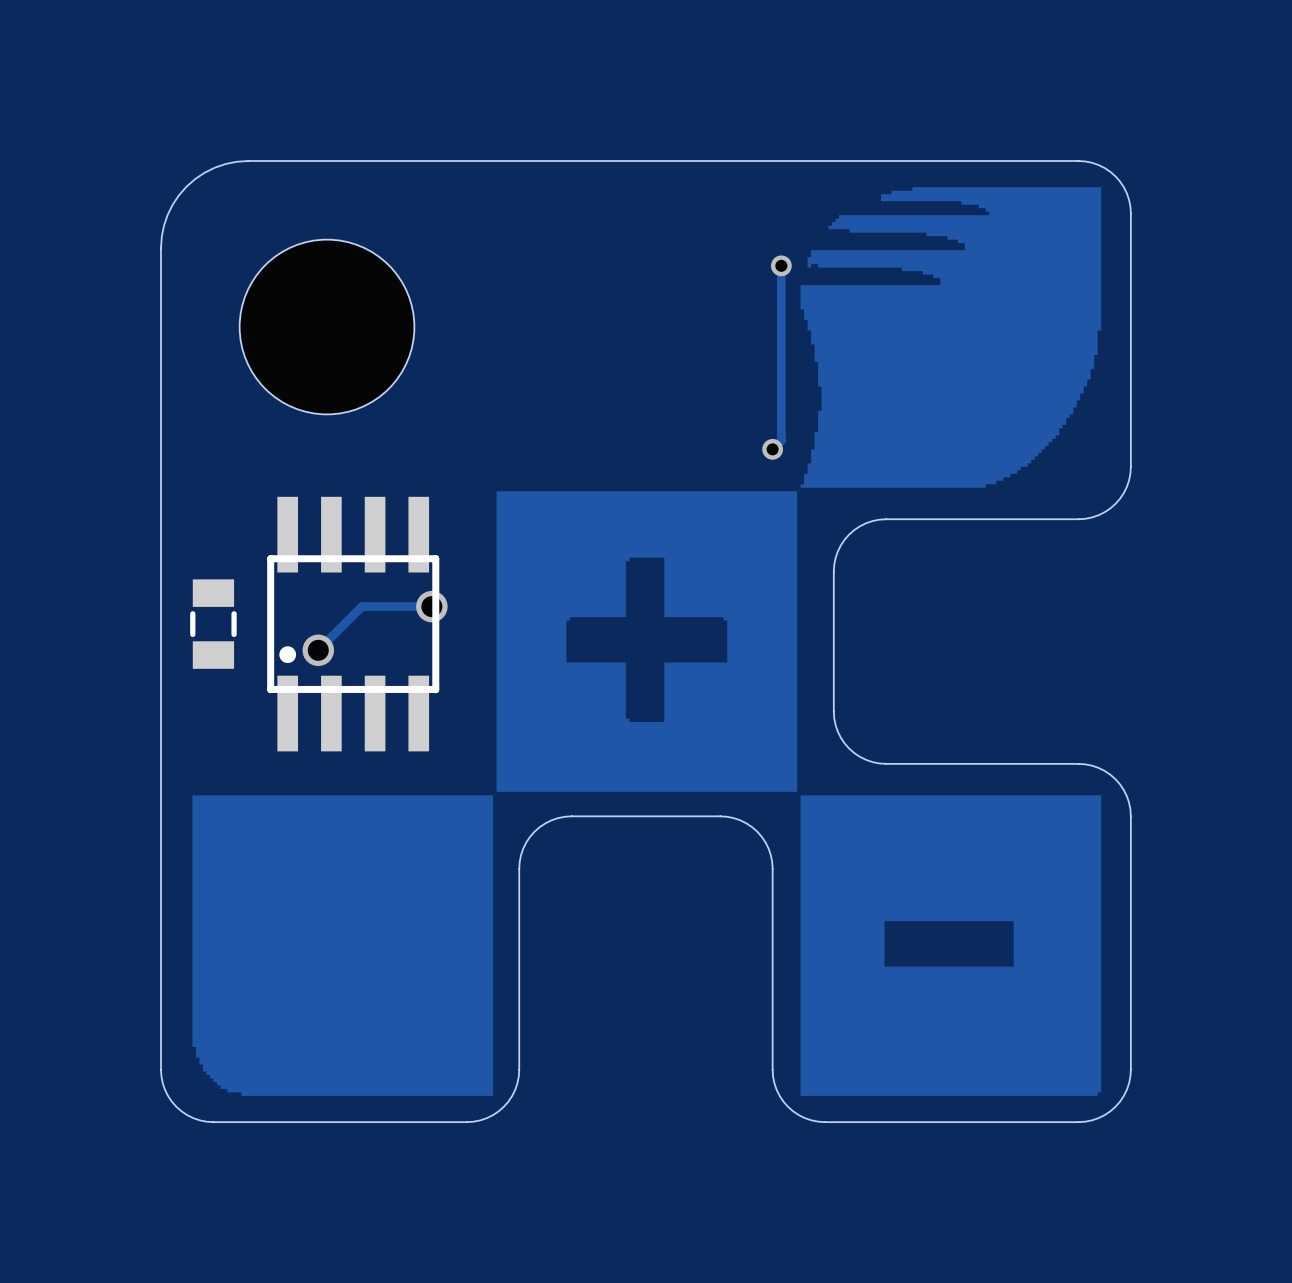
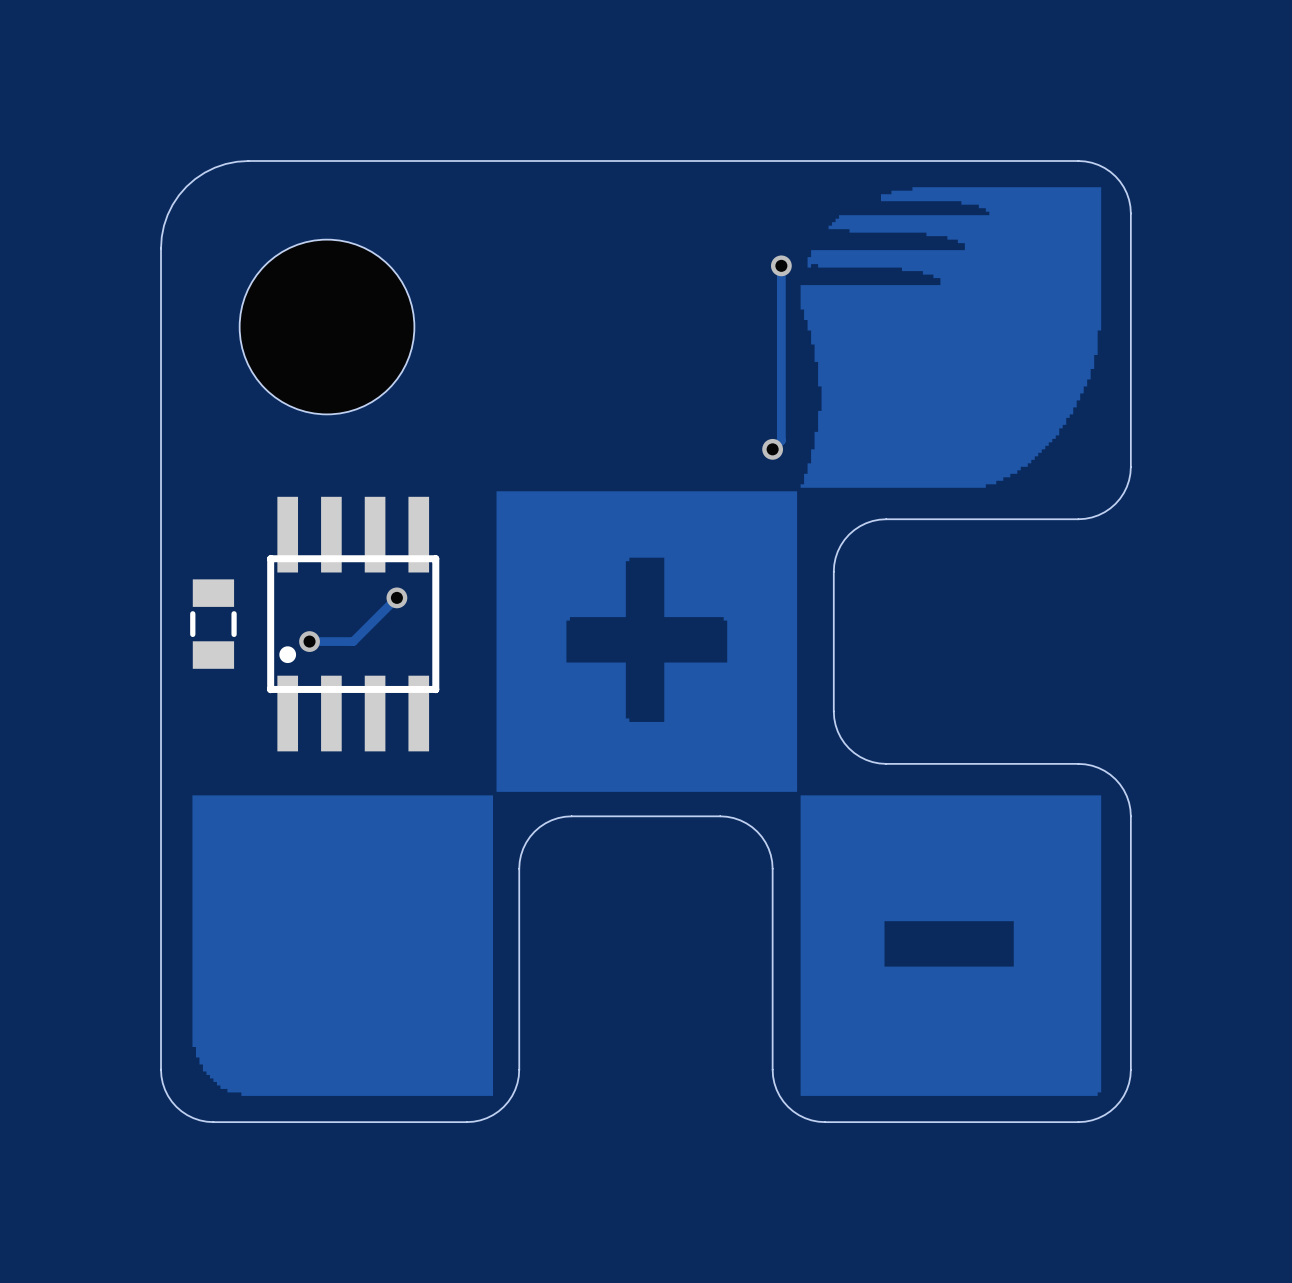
track: none -> (396, 597) (353, 641) (309, 641)
via: none -> (396, 597)
track: (431, 606) (361, 606) (318, 650) -> none
via: (431, 606) -> none
via size: [302, 634, 335, 667] -> [299, 631, 320, 652]

